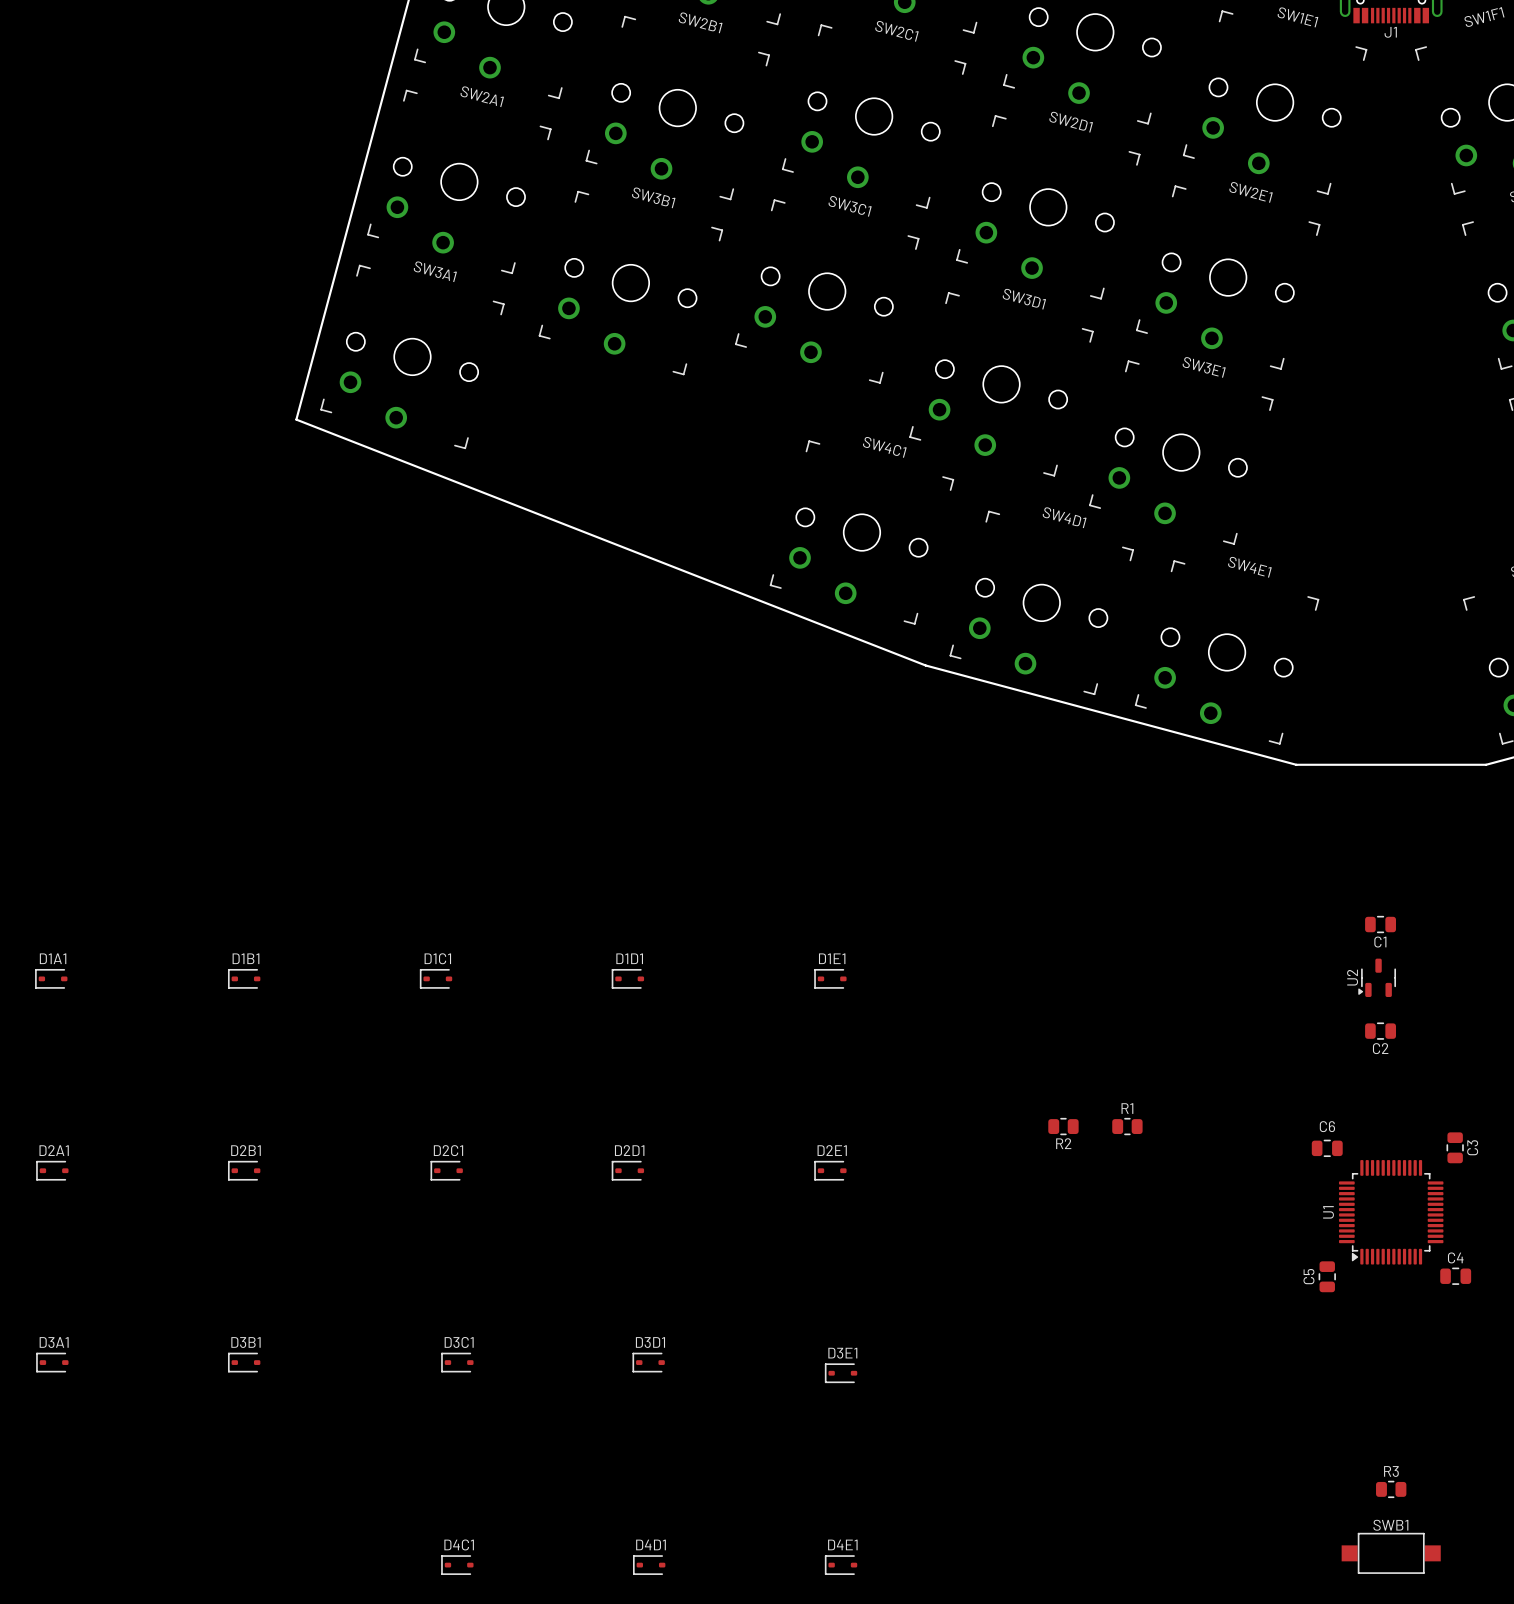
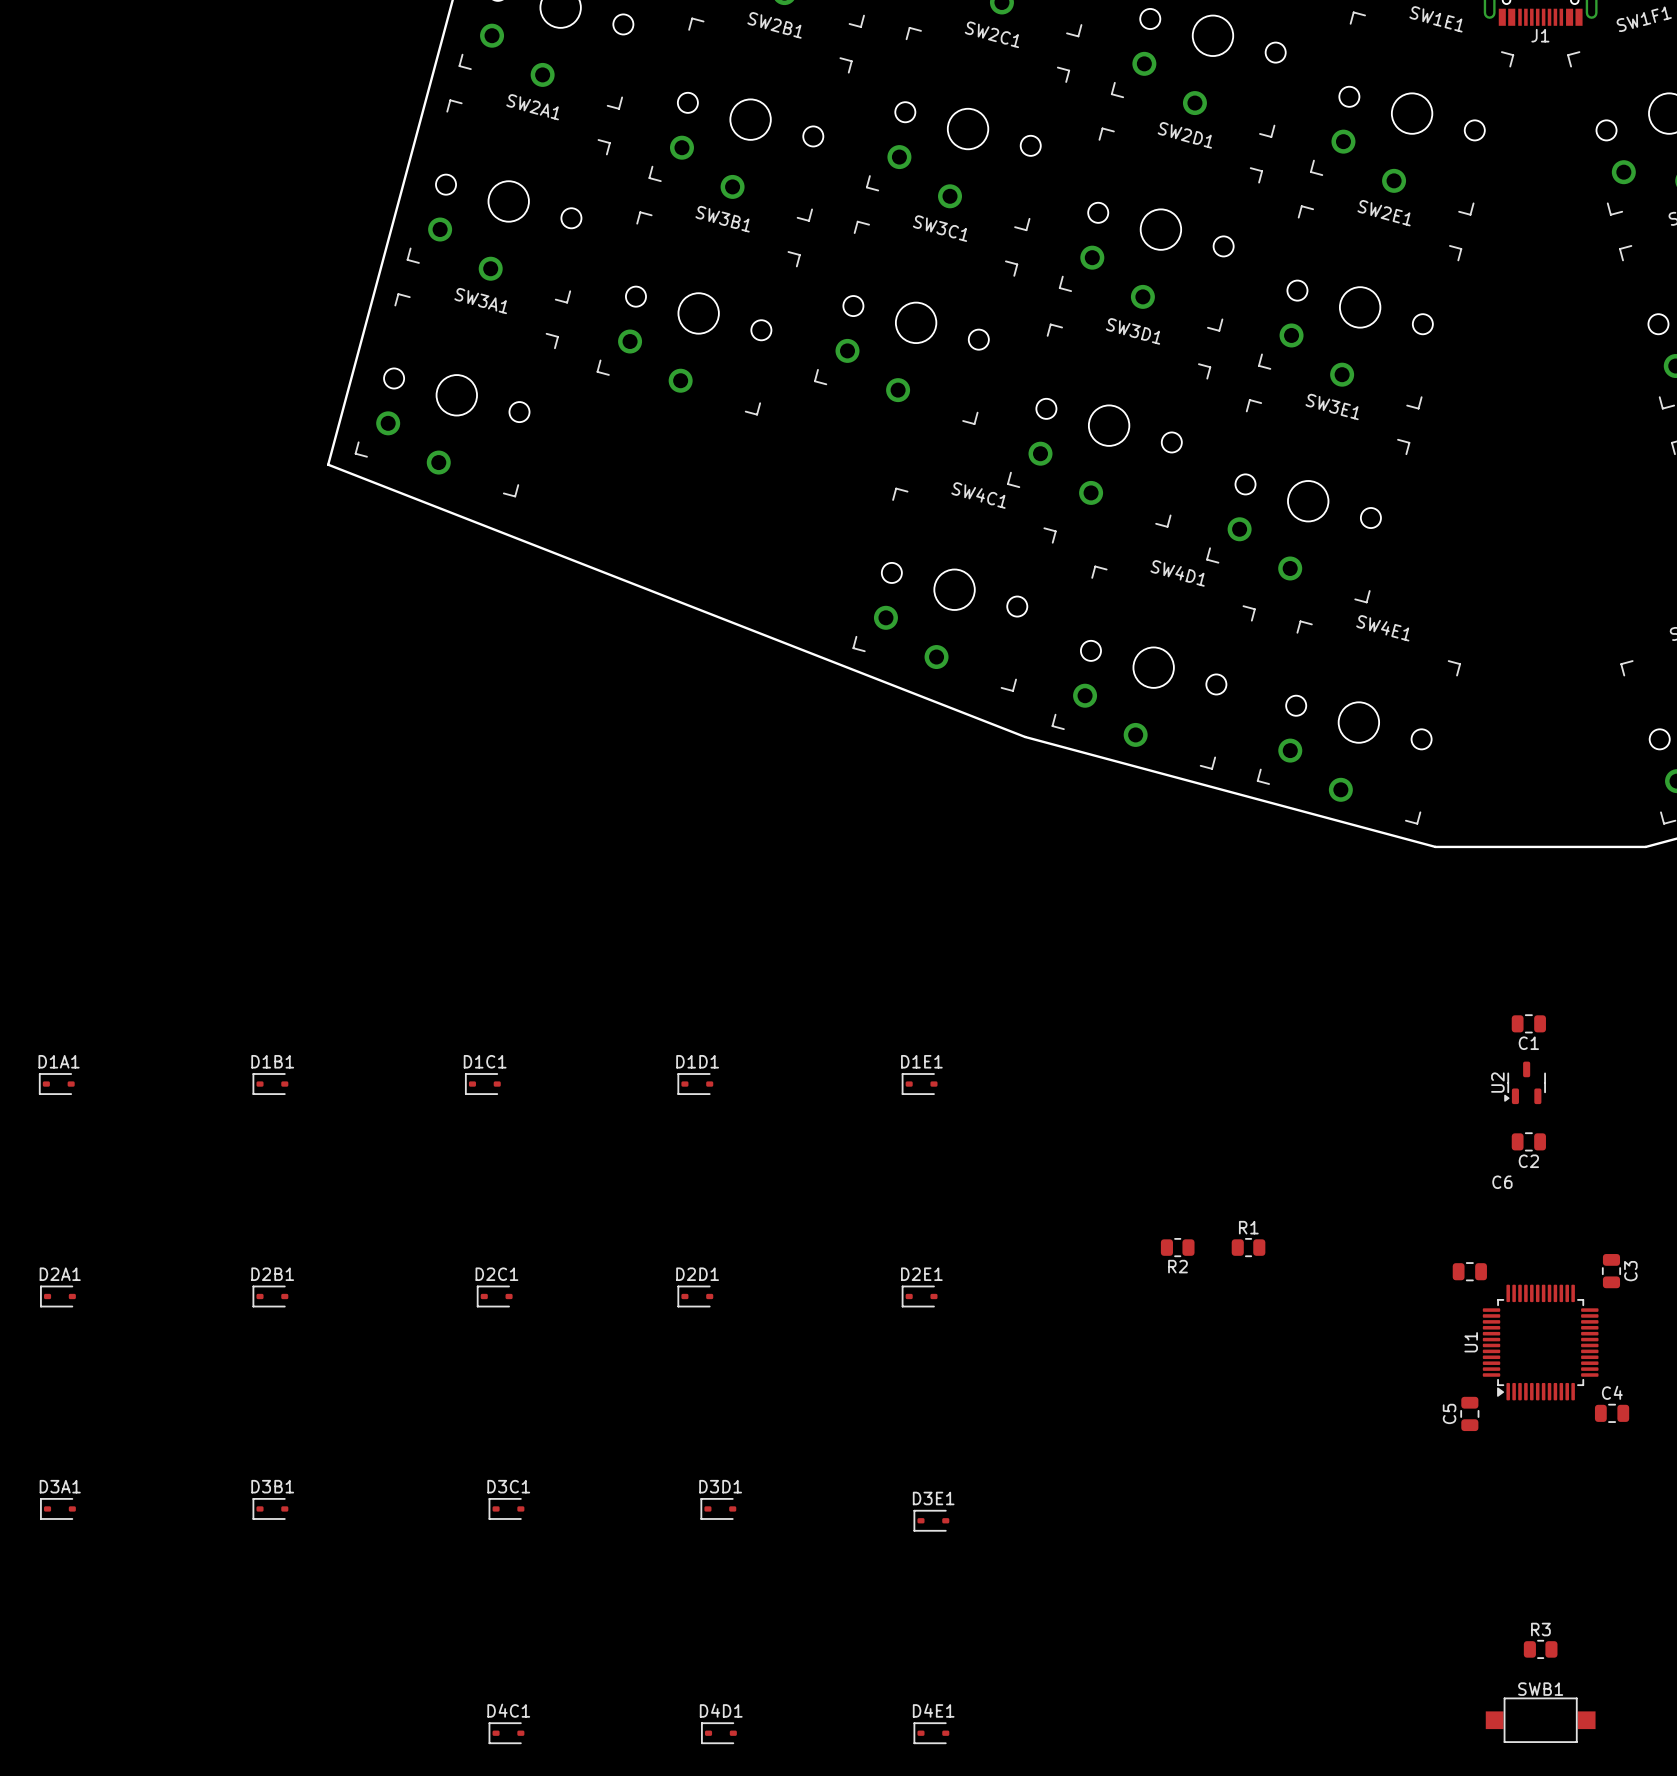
C6 name position: C6 (1327, 1126) -> C6 (1502, 1182)

